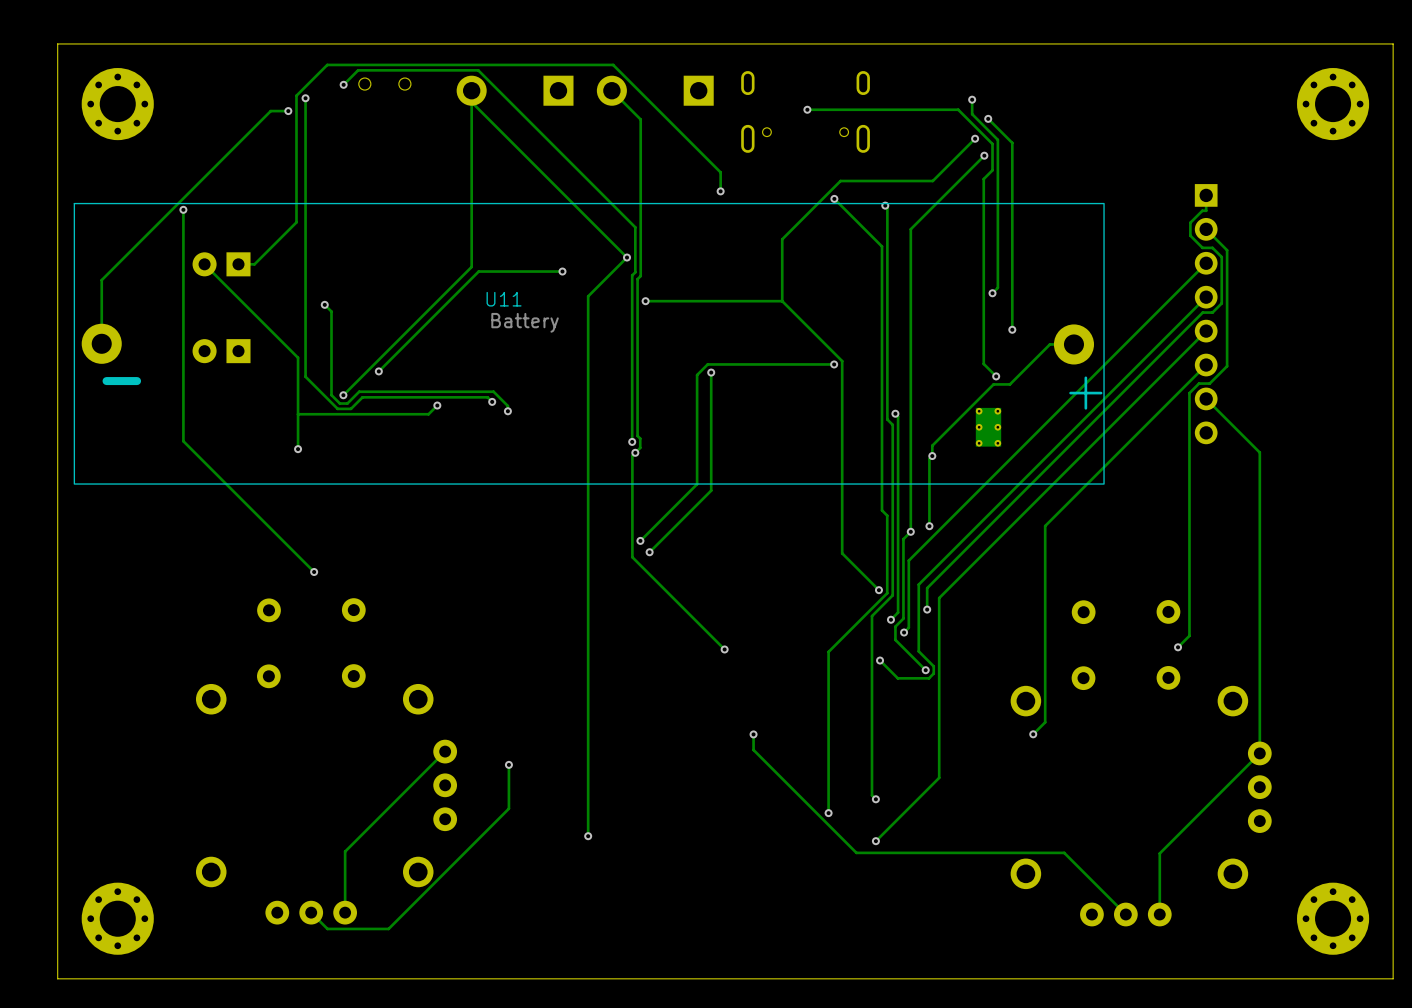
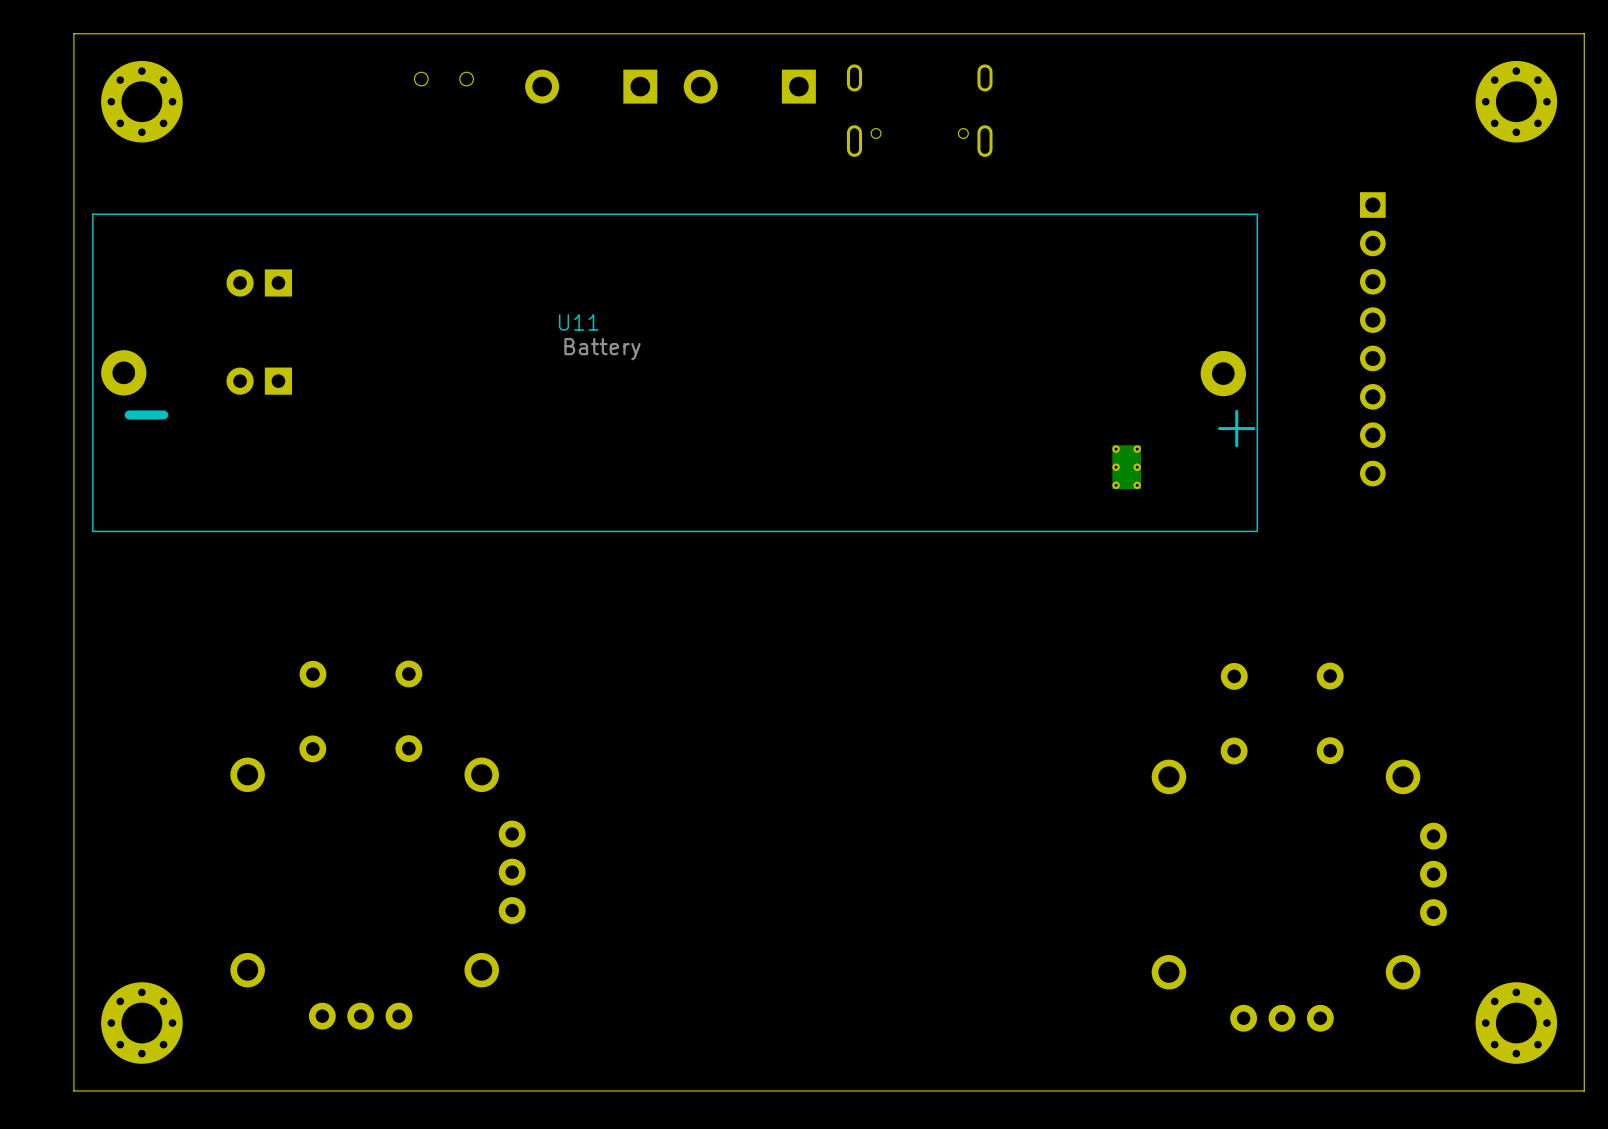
track: (343, 84) (358, 70) (478, 70) (635, 227) (635, 272) (632, 275) (632, 441) -> none
via: (343, 84) -> none
track: (471, 90) (471, 266) (343, 395) -> none
track: (611, 90) (640, 119) (640, 276) (637, 279) (637, 435) (640, 438) (640, 447) (632, 455) (632, 557) (724, 649) -> none
track: (305, 98) (305, 376) (337, 408) (350, 408) (362, 397) (487, 397) (492, 401) -> none
via: (305, 98) -> none
track: (972, 99) (972, 114) (997, 139) (997, 287) (992, 293) -> none
via: (972, 99) -> none
track: (471, 102) (627, 257) (588, 296) (588, 836) -> none
track: (807, 109) (958, 109) (992, 144) (992, 170) (983, 179) (983, 363) (996, 376) -> none
via: (807, 109) -> none
track: (288, 111) (270, 111) (101, 280) (101, 343) -> none
via: (288, 111) -> none
track: (988, 118) (1012, 142) (1012, 329) -> none
via: (988, 118) -> none
track: (975, 138) (932, 181) (840, 181) (782, 239) (782, 301) -> none
via: (975, 138) -> none
track: (984, 155) (910, 229) (910, 531) (903, 539) (903, 618) (895, 626) (895, 639) (925, 670) -> none
via: (984, 155) -> none
track: (720, 191) (720, 172) (613, 64) (327, 64) (296, 95) (296, 222) (254, 264) (238, 264) -> none
via: (720, 191) -> none
track: (1206, 195) (1206, 210) (1202, 210) (1190, 222) (1190, 235) (1202, 247) (1212, 247) (1221, 257) (1221, 303) (1212, 312) (1202, 312) (927, 588) (927, 609) -> none
track: (834, 198) (882, 246) (882, 510) (887, 515) (887, 593) (828, 651) (828, 813) -> none
via: (834, 198) -> none
track: (885, 205) (887, 207) (887, 419) (892, 424) (892, 595) (871, 616) (871, 795) (875, 799) -> none
via: (885, 205) -> none
track: (183, 209) (183, 441) (314, 571) -> none
via: (183, 209) -> none
track: (1206, 229) (1227, 250) (1227, 366) (1209, 383) (1199, 383) (1189, 393) (1189, 635) (1178, 647) -> none
via: (627, 257) -> none
track: (1206, 263) (908, 560) (908, 627) (904, 632) -> none
track: (204, 264) (298, 357) (298, 449) -> none
track: (562, 271) (478, 271) (378, 371) -> none
via: (562, 271) -> none
via: (992, 293) -> none
track: (1206, 297) (918, 584) (918, 651) (933, 666) (933, 673) (928, 678) (897, 678) (880, 660) -> none
via: (645, 301) -> none
track: (782, 301) (645, 301) -> none
track: (782, 301) (842, 361) (842, 553) (878, 590) -> none
track: (324, 304) (331, 311) (331, 395) (339, 403) (347, 403) (359, 391) (493, 391) (507, 406) (507, 411) -> none
via: (324, 304) -> none
via: (1012, 329) -> none
track: (1206, 331) (939, 598) (939, 777) (875, 841) -> none
track: (1073, 344) (1049, 344) (1009, 384) (993, 384) (932, 445) (932, 456) (929, 458) (929, 526) -> none
track: (834, 364) (707, 364) (697, 375) (697, 484) (640, 540) -> none
via: (834, 364) -> none
track: (1206, 365) (1045, 526) (1045, 722) (1033, 734) -> none
via: (378, 371) -> none
track: (711, 372) (711, 490) (649, 552) -> none
via: (711, 372) -> none
via: (996, 376) -> none
via: (343, 395) -> none
track: (1206, 398) (1259, 452) (1259, 753) (1159, 853) (1159, 914) -> none
via: (492, 401) -> none
track: (437, 405) (428, 414) (298, 414) -> none
via: (437, 405) -> none
via: (507, 411) -> none
track: (895, 413) (898, 416) (898, 612) (890, 619) -> none
via: (895, 413) -> none
via: (632, 441) -> none
via: (298, 449) -> none
via: (635, 452) -> none
via: (932, 456) -> none
via: (929, 526) -> none
via: (910, 531) -> none
via: (640, 540) -> none
via: (649, 552) -> none
via: (314, 571) -> none
via: (878, 590) -> none
via: (927, 609) -> none
via: (890, 619) -> none
via: (904, 632) -> none
via: (1178, 647) -> none
via: (724, 649) -> none
via: (880, 660) -> none
via: (925, 670) -> none
track: (753, 734) (753, 749) (856, 852) (1064, 852) (1125, 914) -> none
via: (753, 734) -> none
via: (1033, 734) -> none
track: (445, 751) (345, 851) (345, 912) -> none
track: (508, 764) (508, 808) (388, 928) (327, 928) (311, 912) -> none
via: (508, 764) -> none
via: (875, 799) -> none
via: (828, 813) -> none
via: (588, 836) -> none
via: (875, 841) -> none

